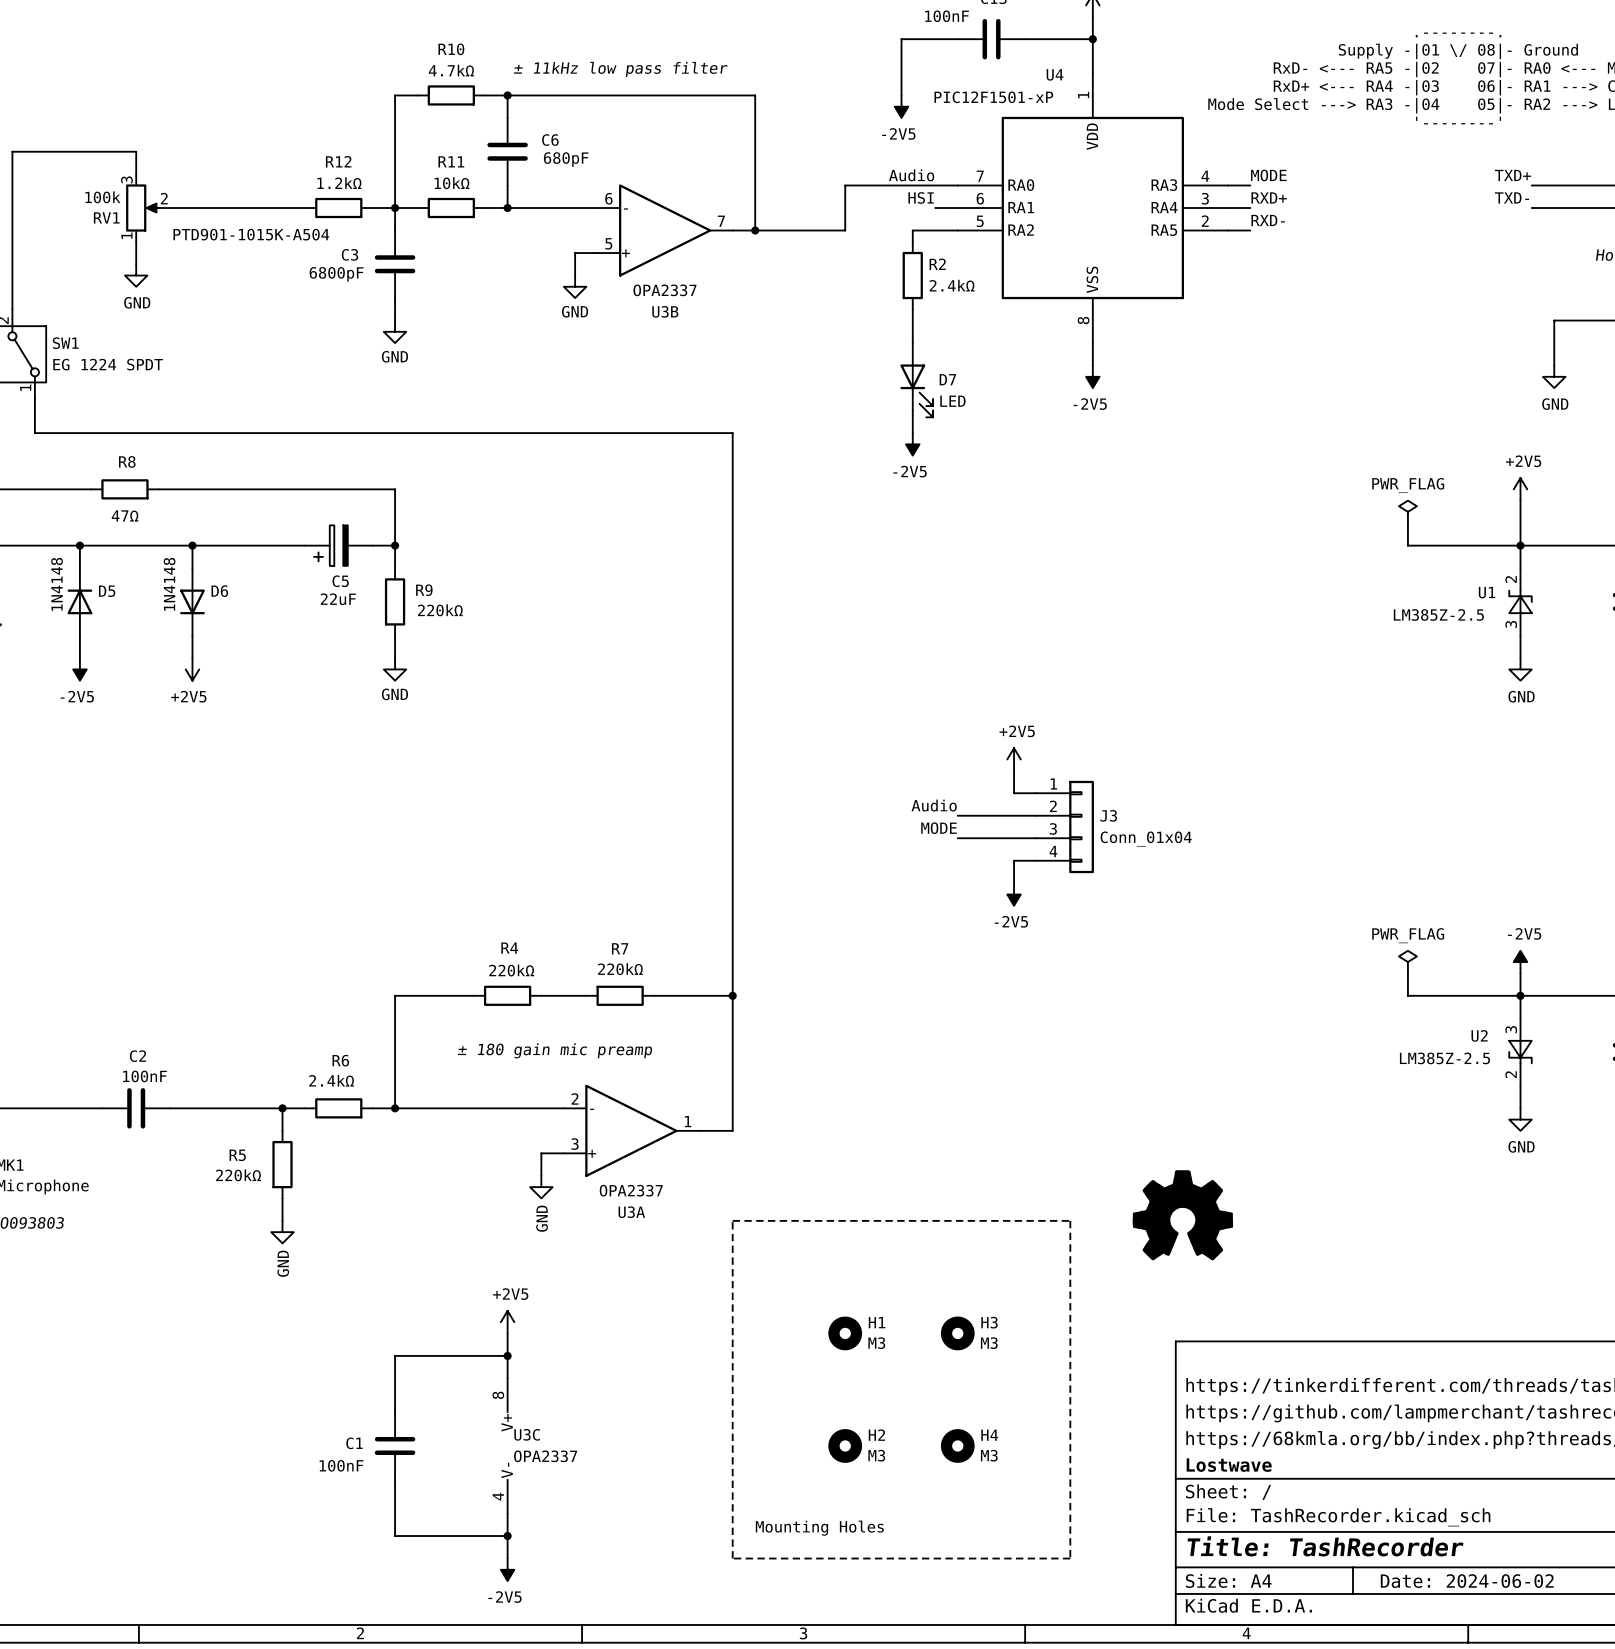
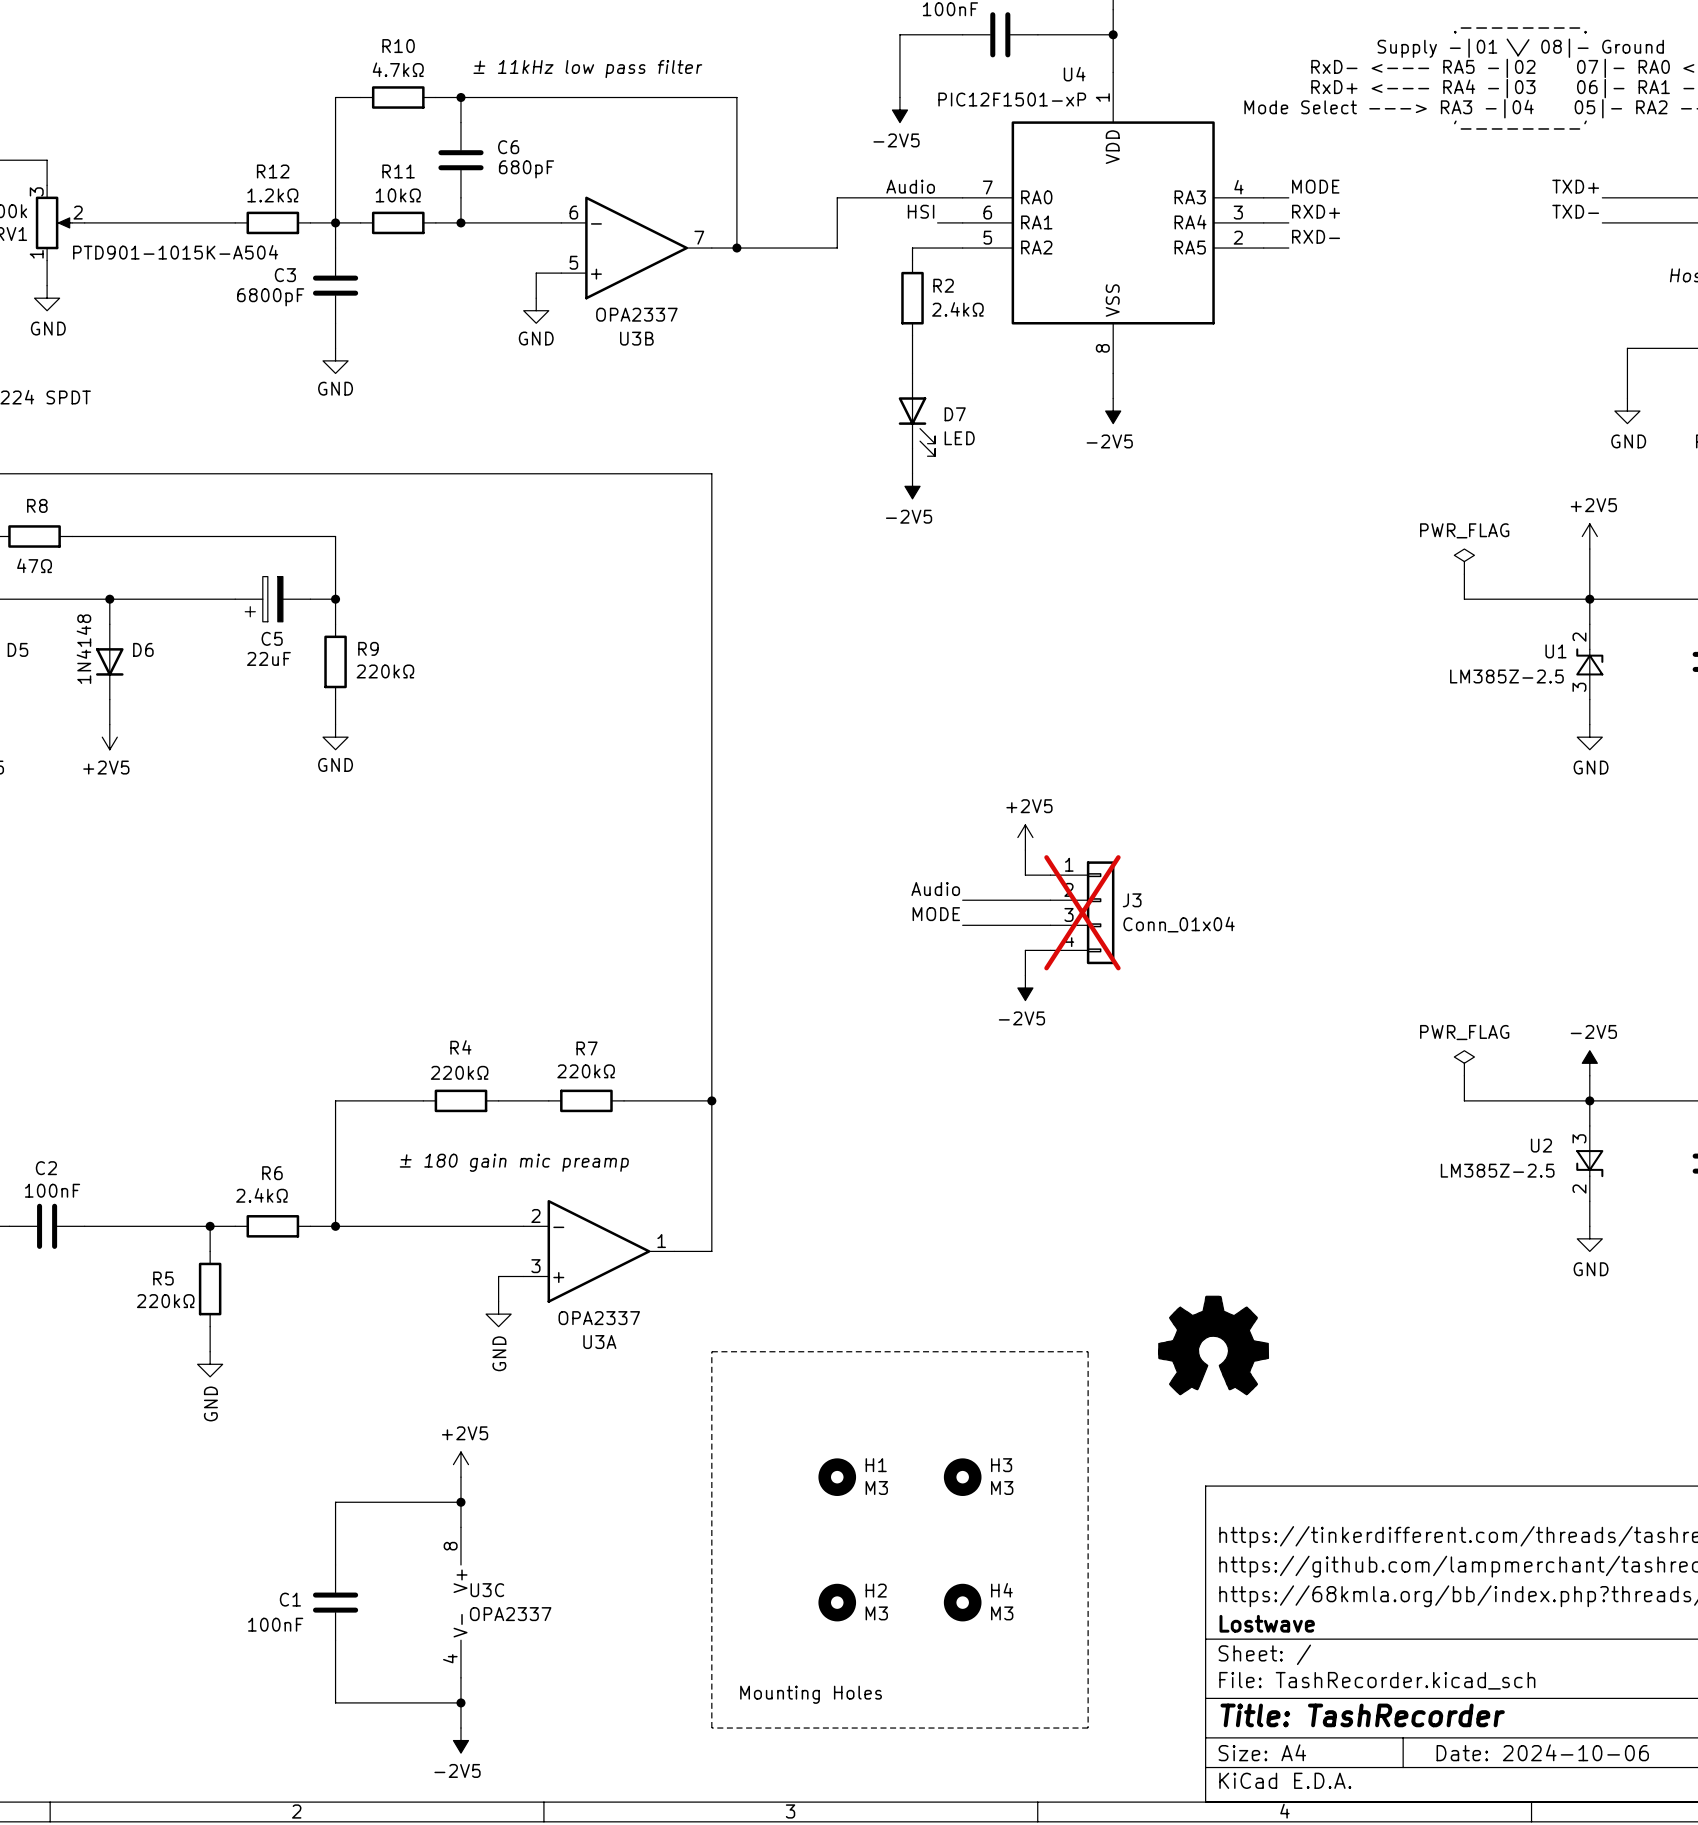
J3 do-not-place cross: none -> (1082, 912)
title block: Date: 2024-06-02 (1467, 1581) -> Date: 2024-10-06 (1542, 1752)

